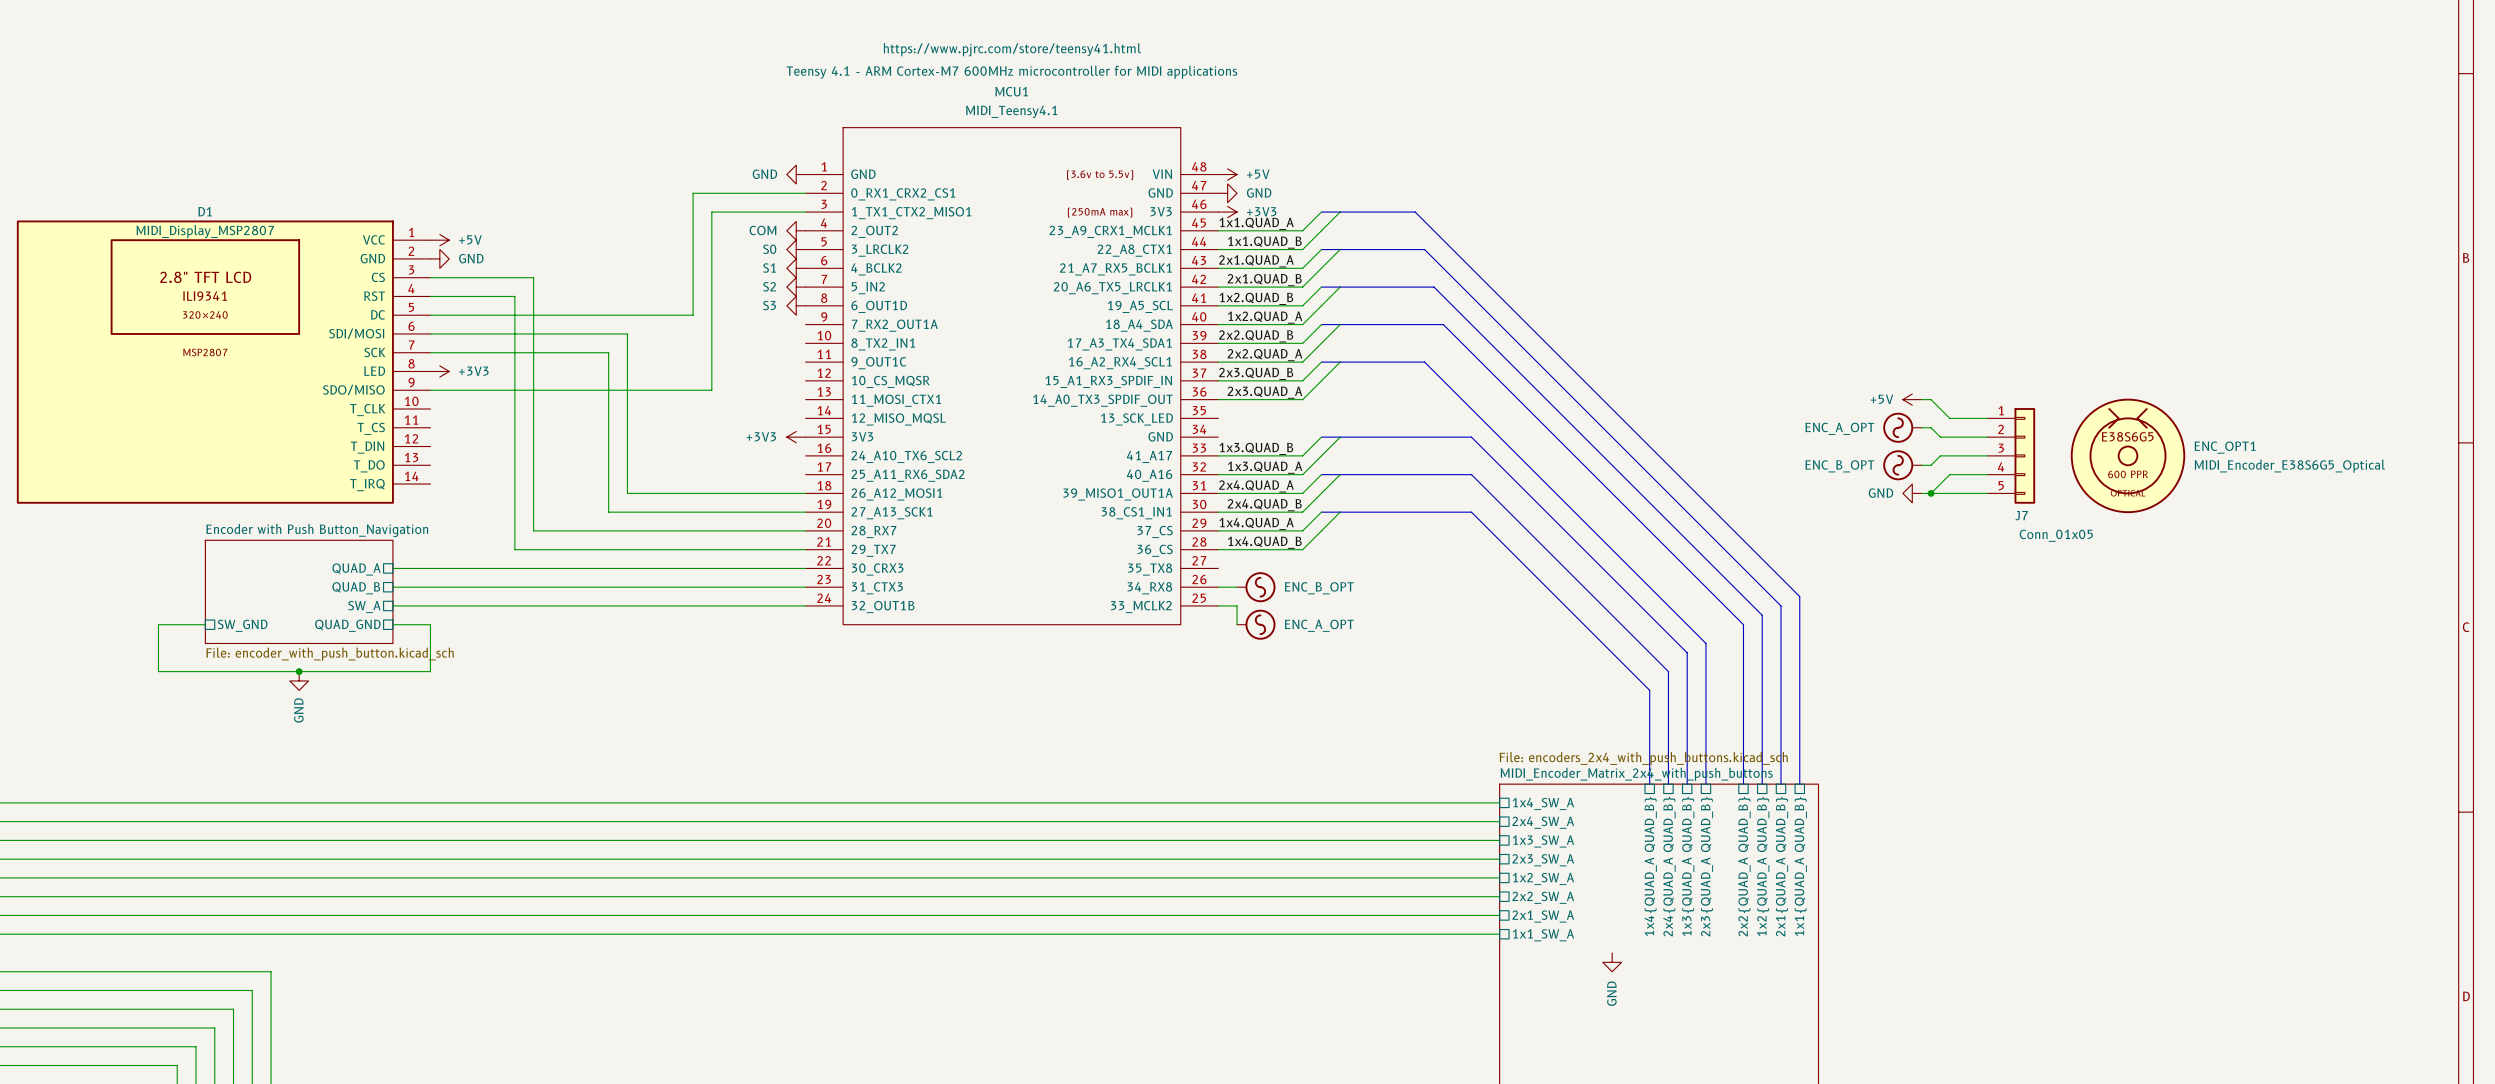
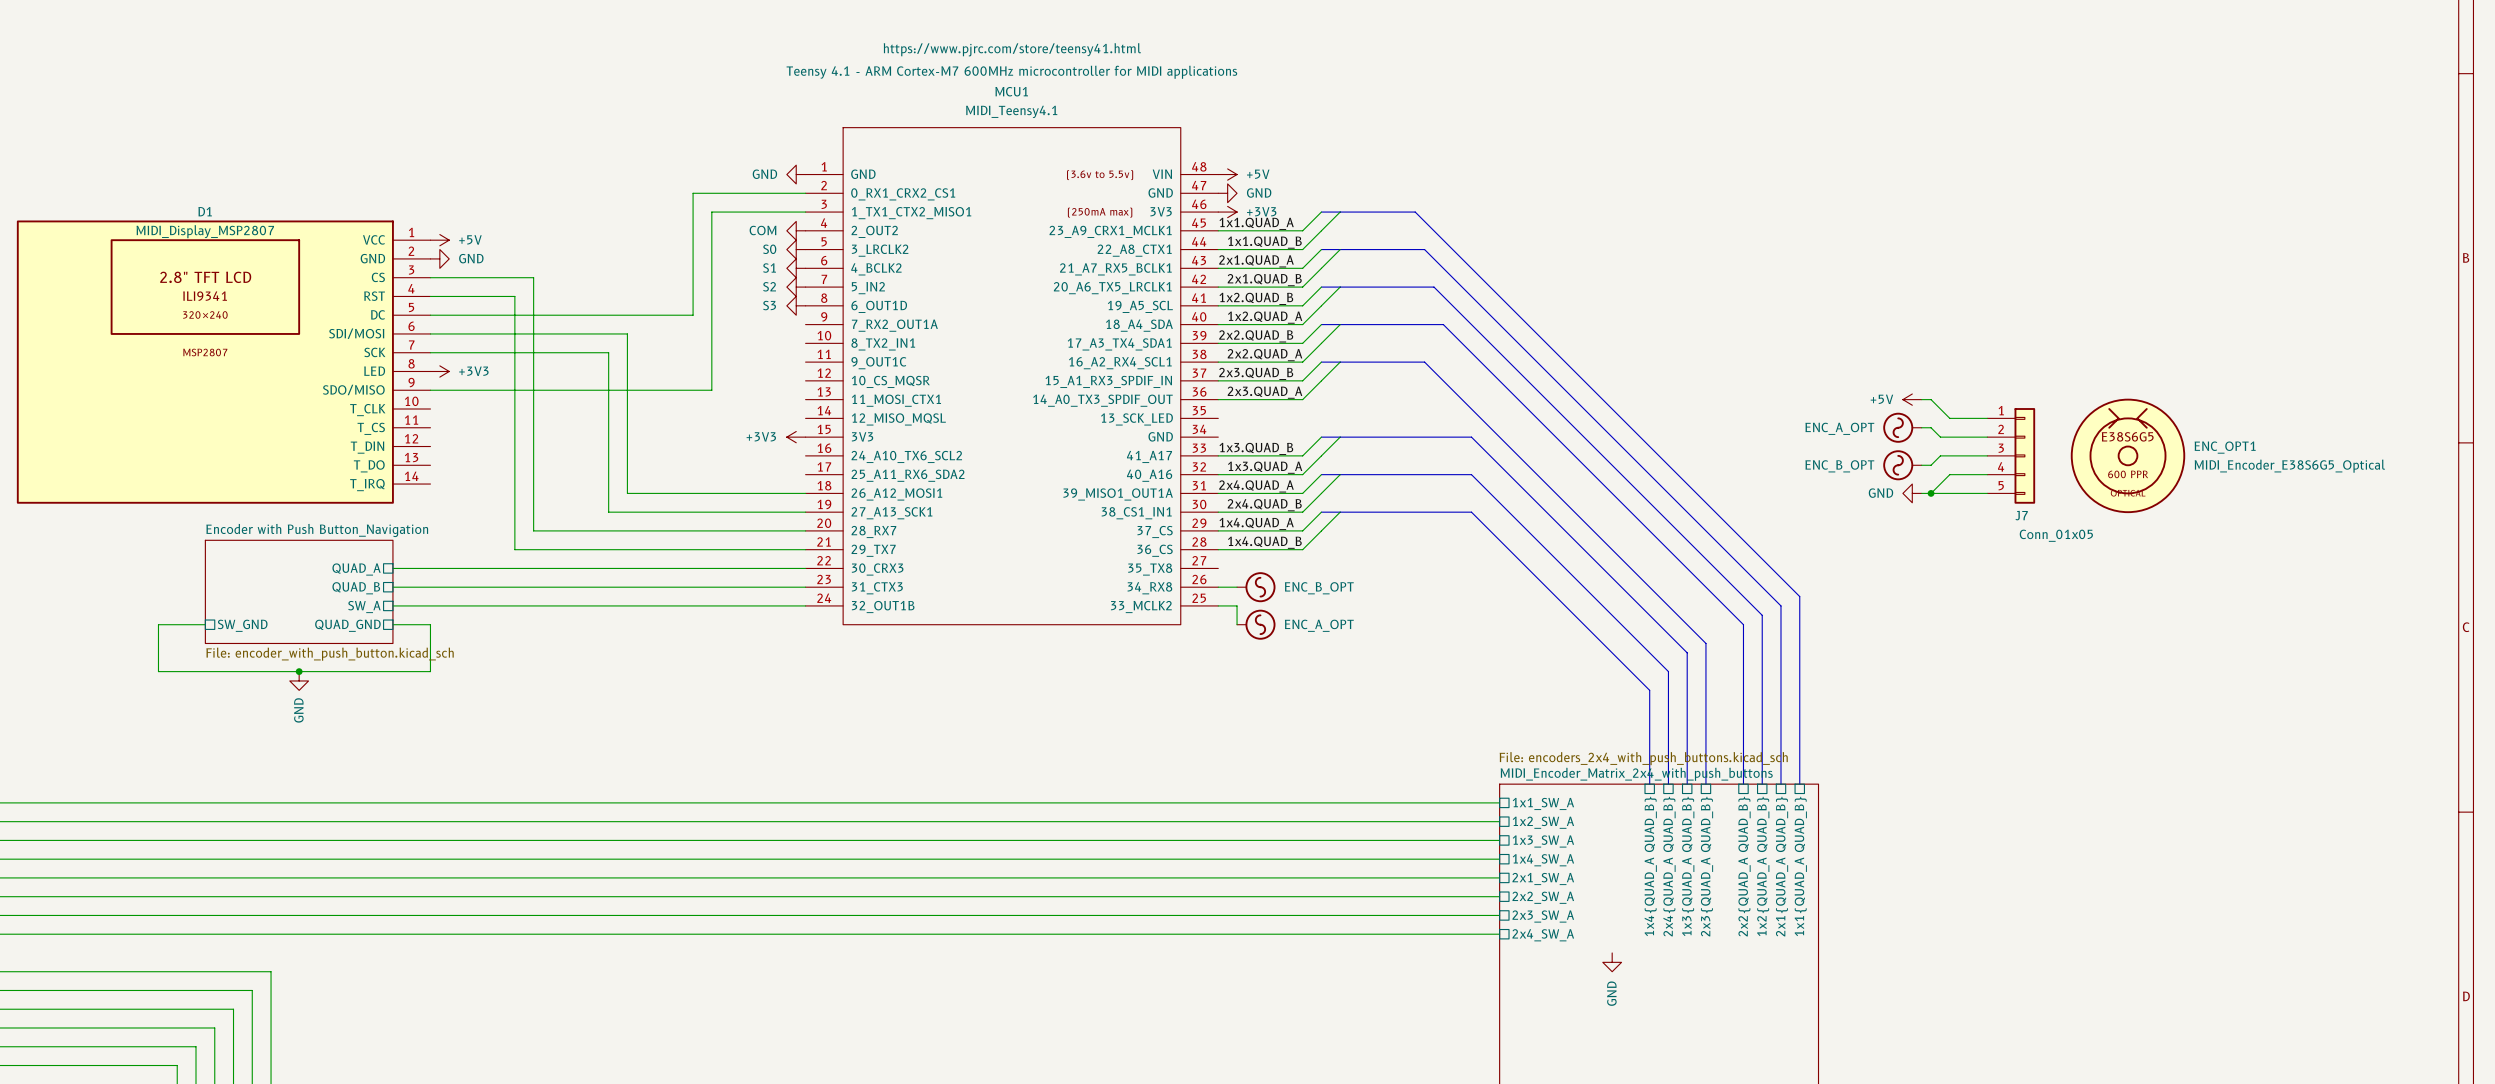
sheet pin: 1x4_SW_A (1543, 803) -> 1x1_SW_A (1543, 803)
sheet pin: 2x4_SW_A (1543, 822) -> 1x2_SW_A (1543, 822)
sheet pin: 2x3_SW_A (1543, 860) -> 1x4_SW_A (1543, 860)
sheet pin: 1x2_SW_A (1543, 878) -> 2x1_SW_A (1543, 878)
sheet pin: 2x1_SW_A (1543, 916) -> 2x3_SW_A (1543, 916)
sheet pin: 1x1_SW_A (1543, 935) -> 2x4_SW_A (1543, 935)

